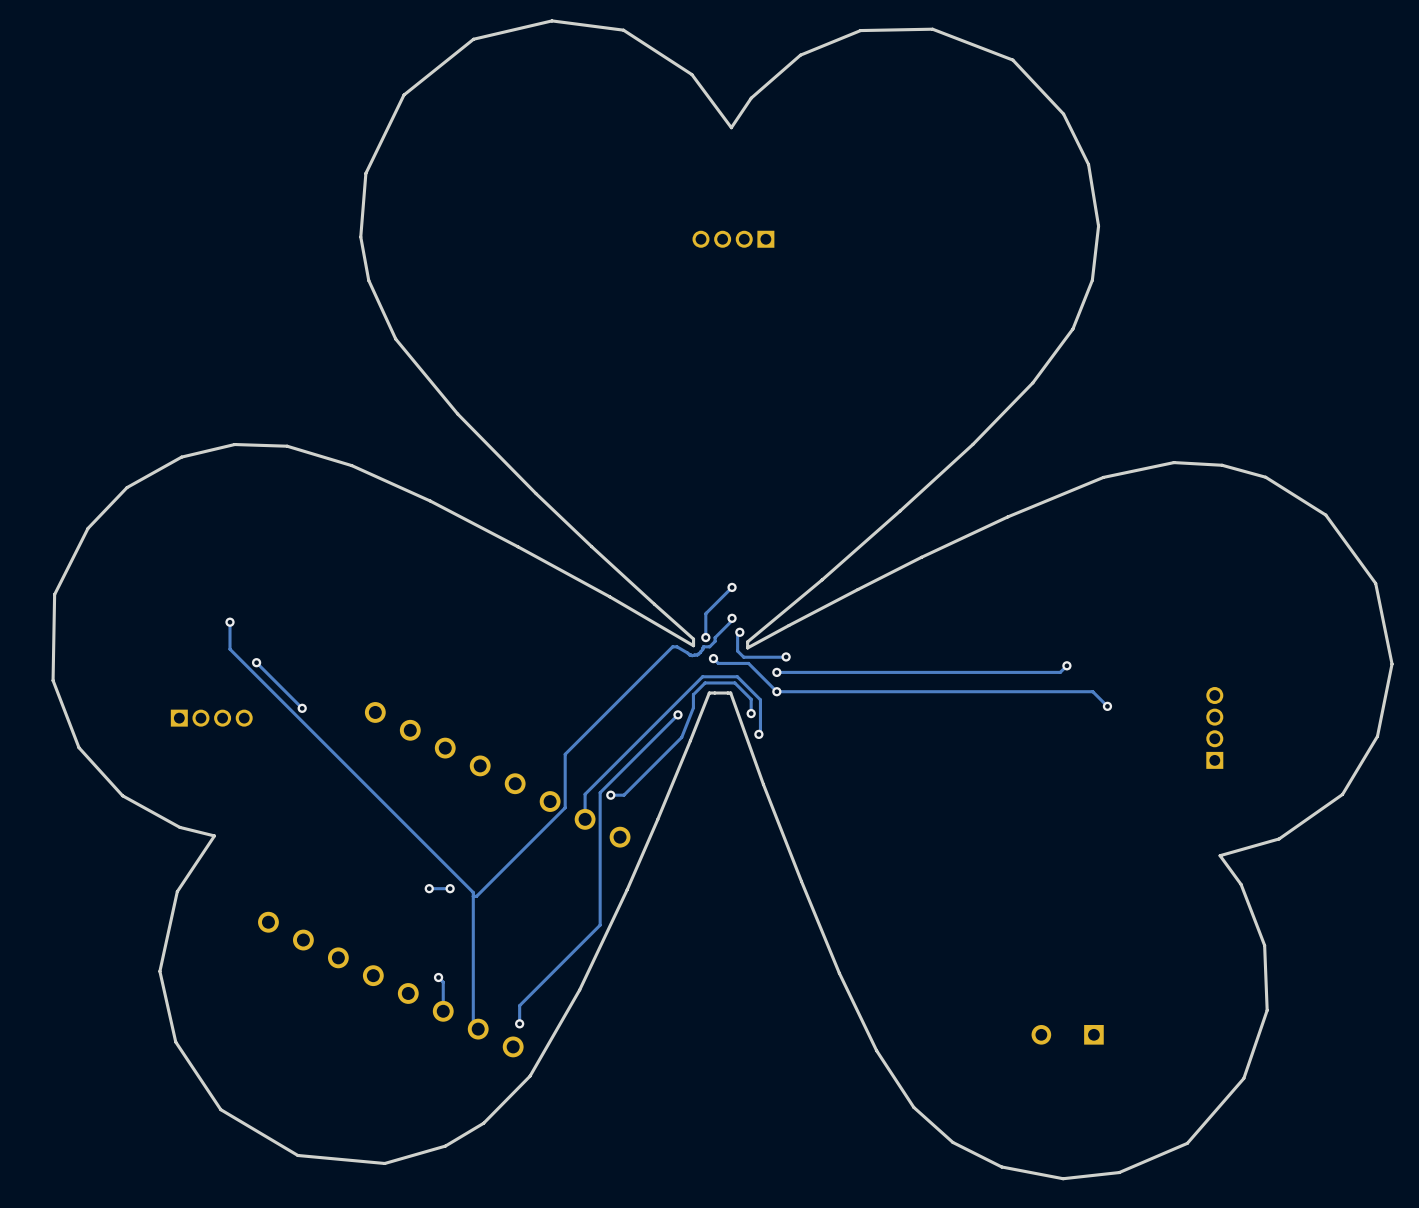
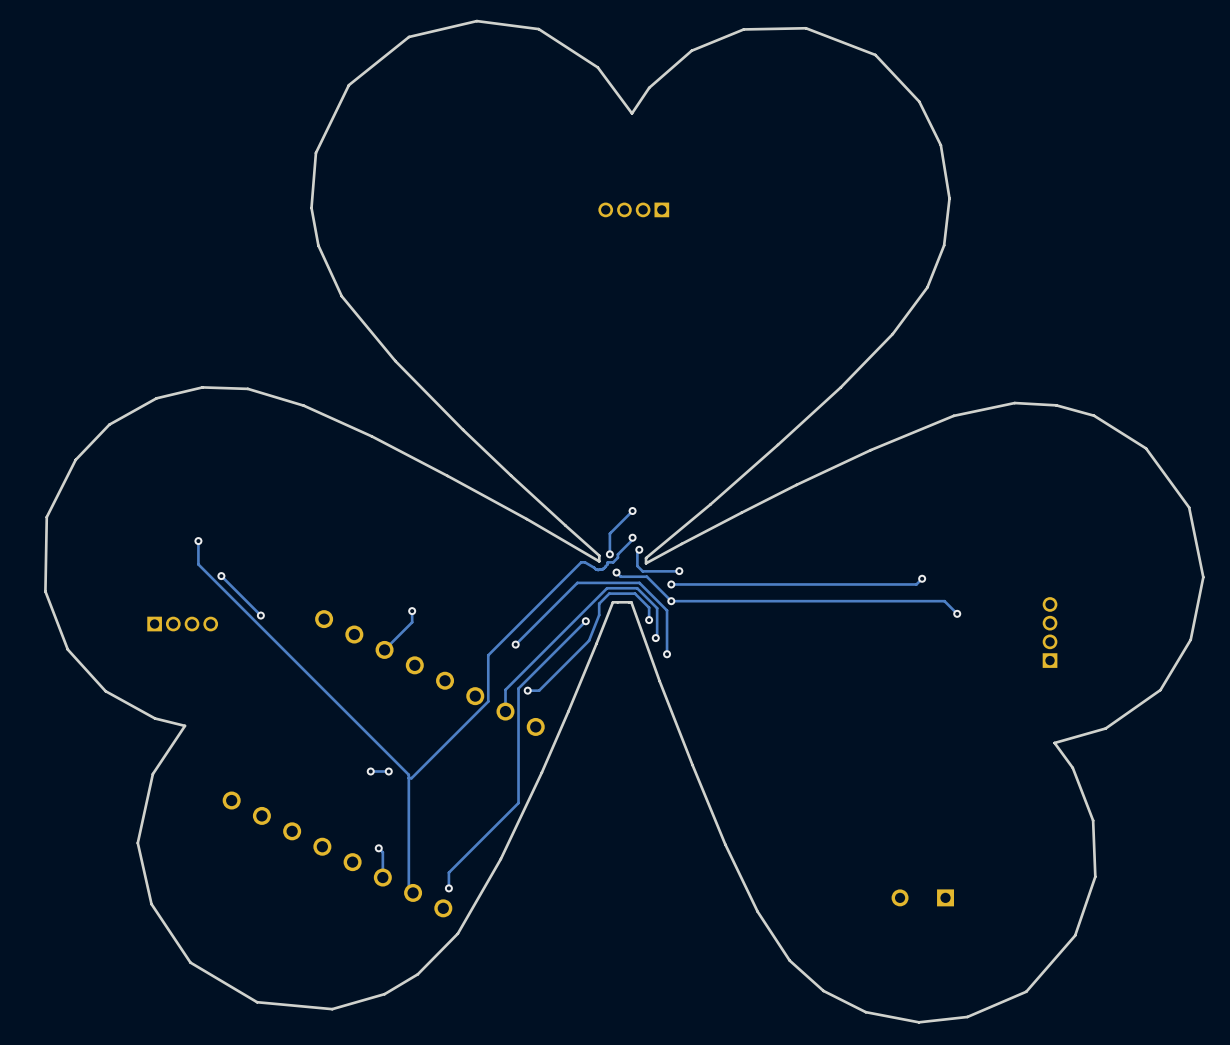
track: none -> (412, 611) (412, 622) (384, 649)
via: none -> (412, 611)
track: none -> (515, 644) (577, 582) (639, 582) (667, 610) (667, 654)
via: none -> (515, 644)
via: none -> (667, 654)

